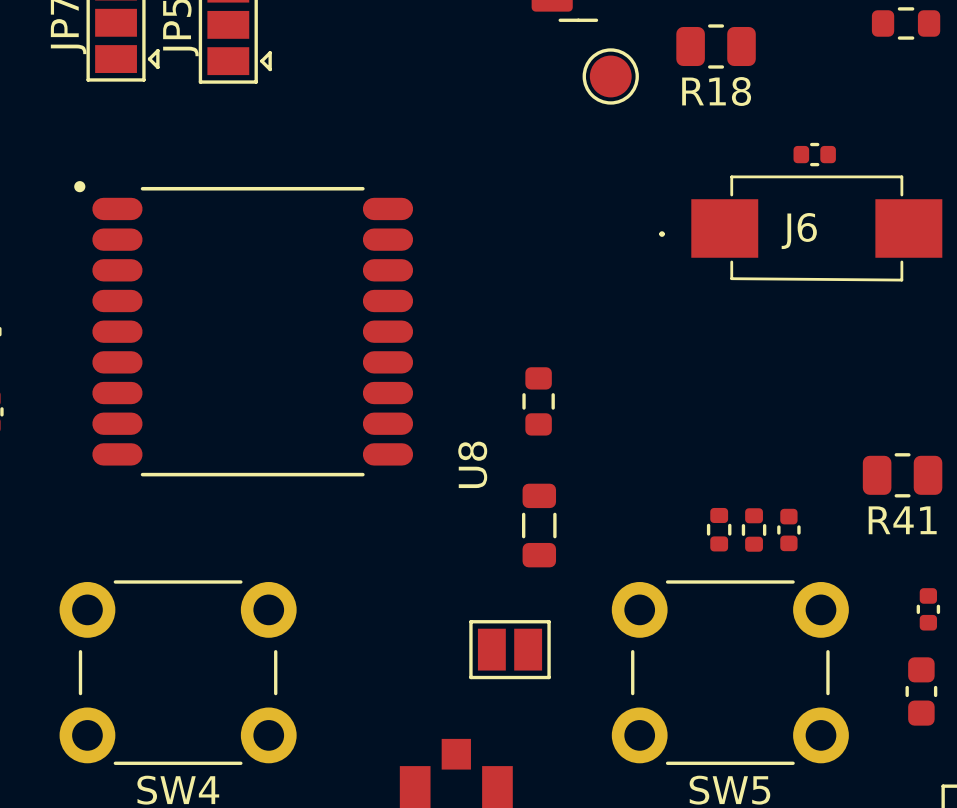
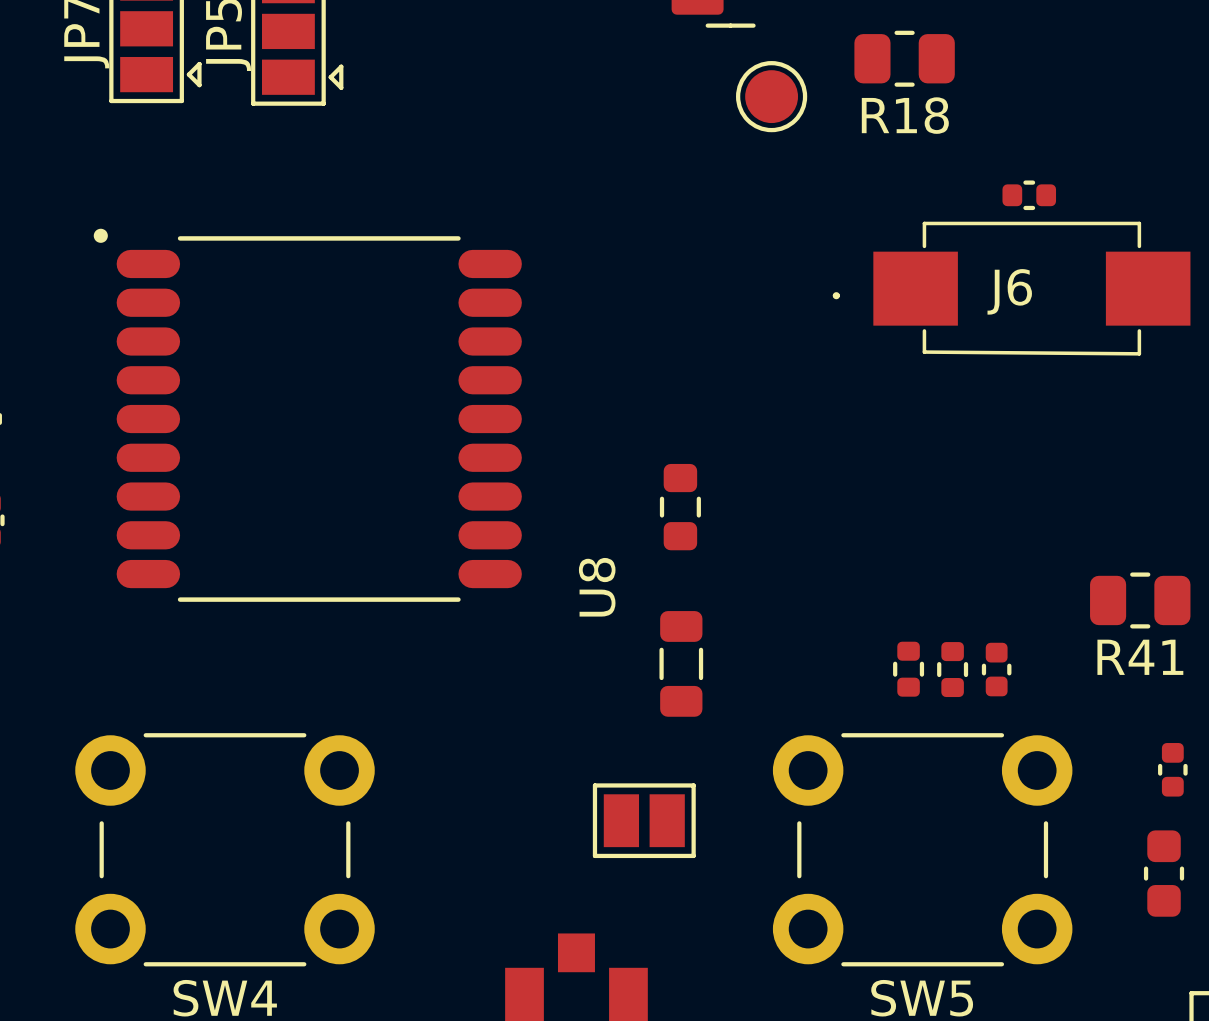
part: (906, 23) -> none

